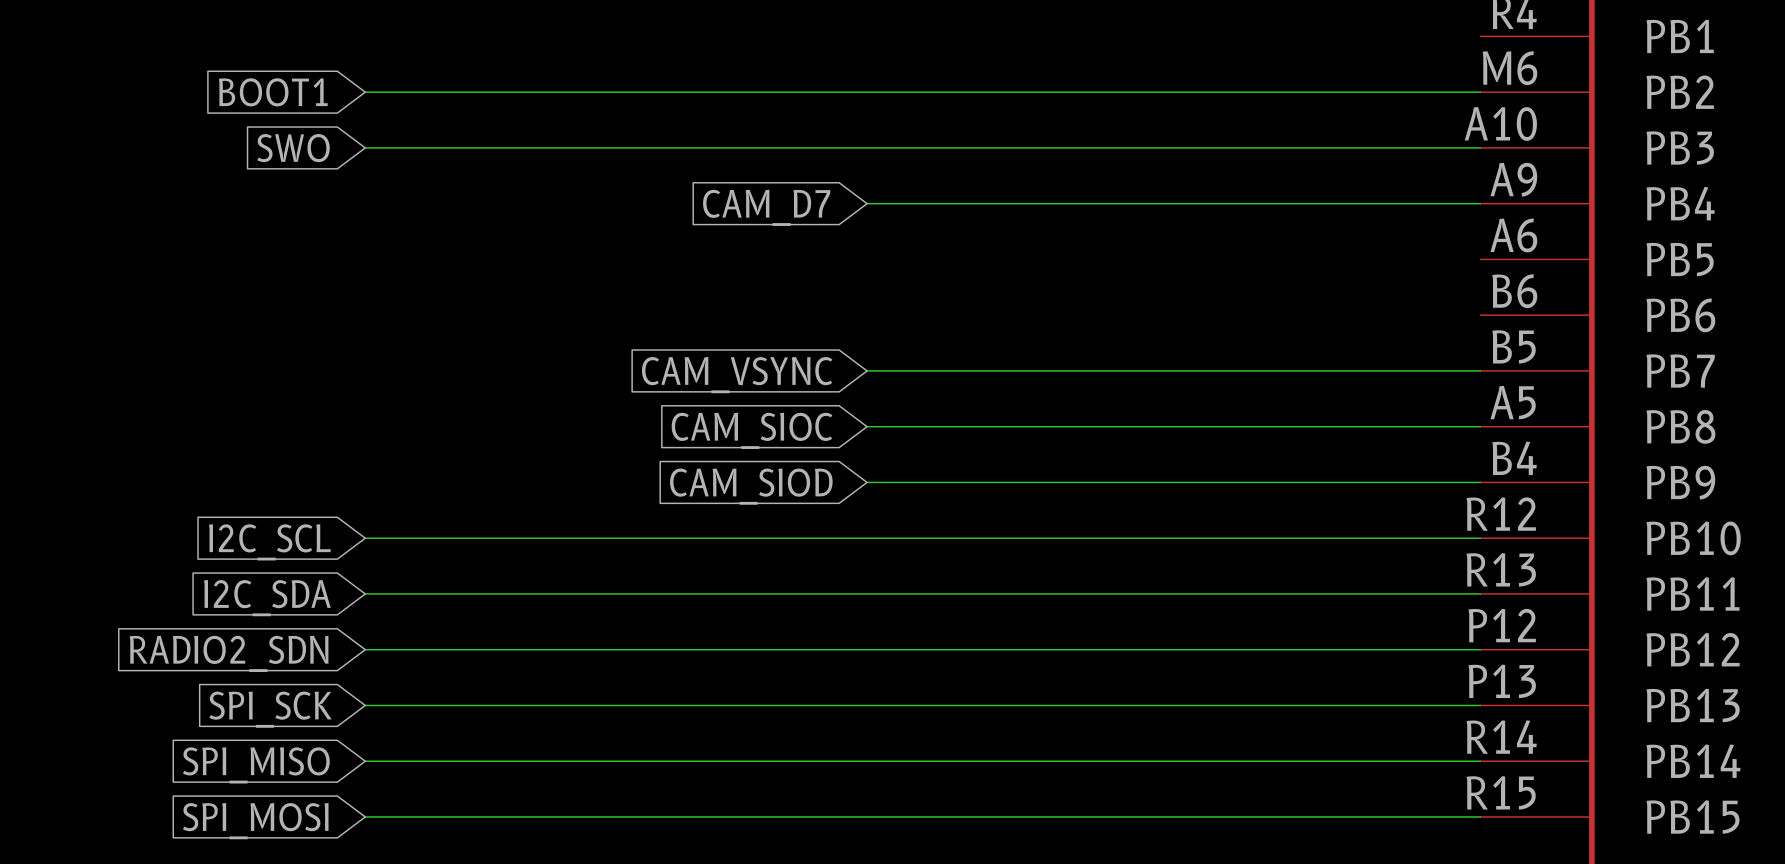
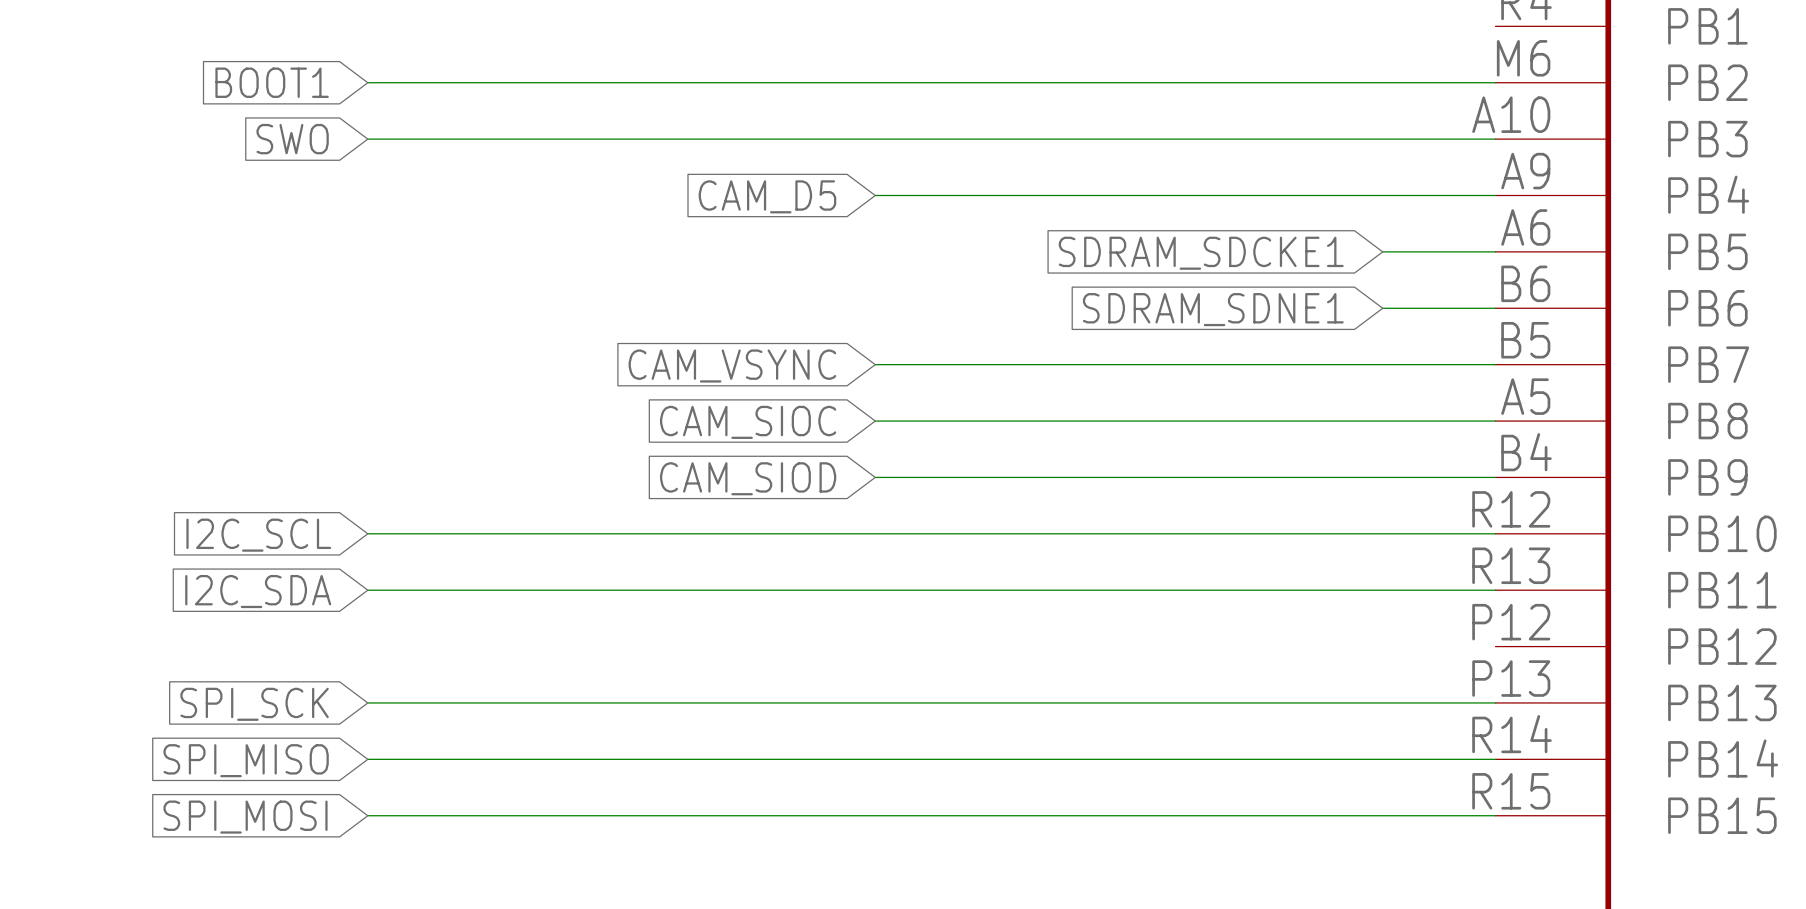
global label: CAM_D7 (766, 207) -> CAM_D5 (767, 196)
wire: none -> (1382, 251) (1495, 251)
global label: none -> SDRAM_SDCKE1 (1201, 253)
wire: none -> (1382, 308) (1495, 308)
global label: none -> SDRAM_SDNE1 (1213, 309)
wire: (365, 649) (1480, 649) -> none
global label: RADIO2_SDN (229, 653) -> none

